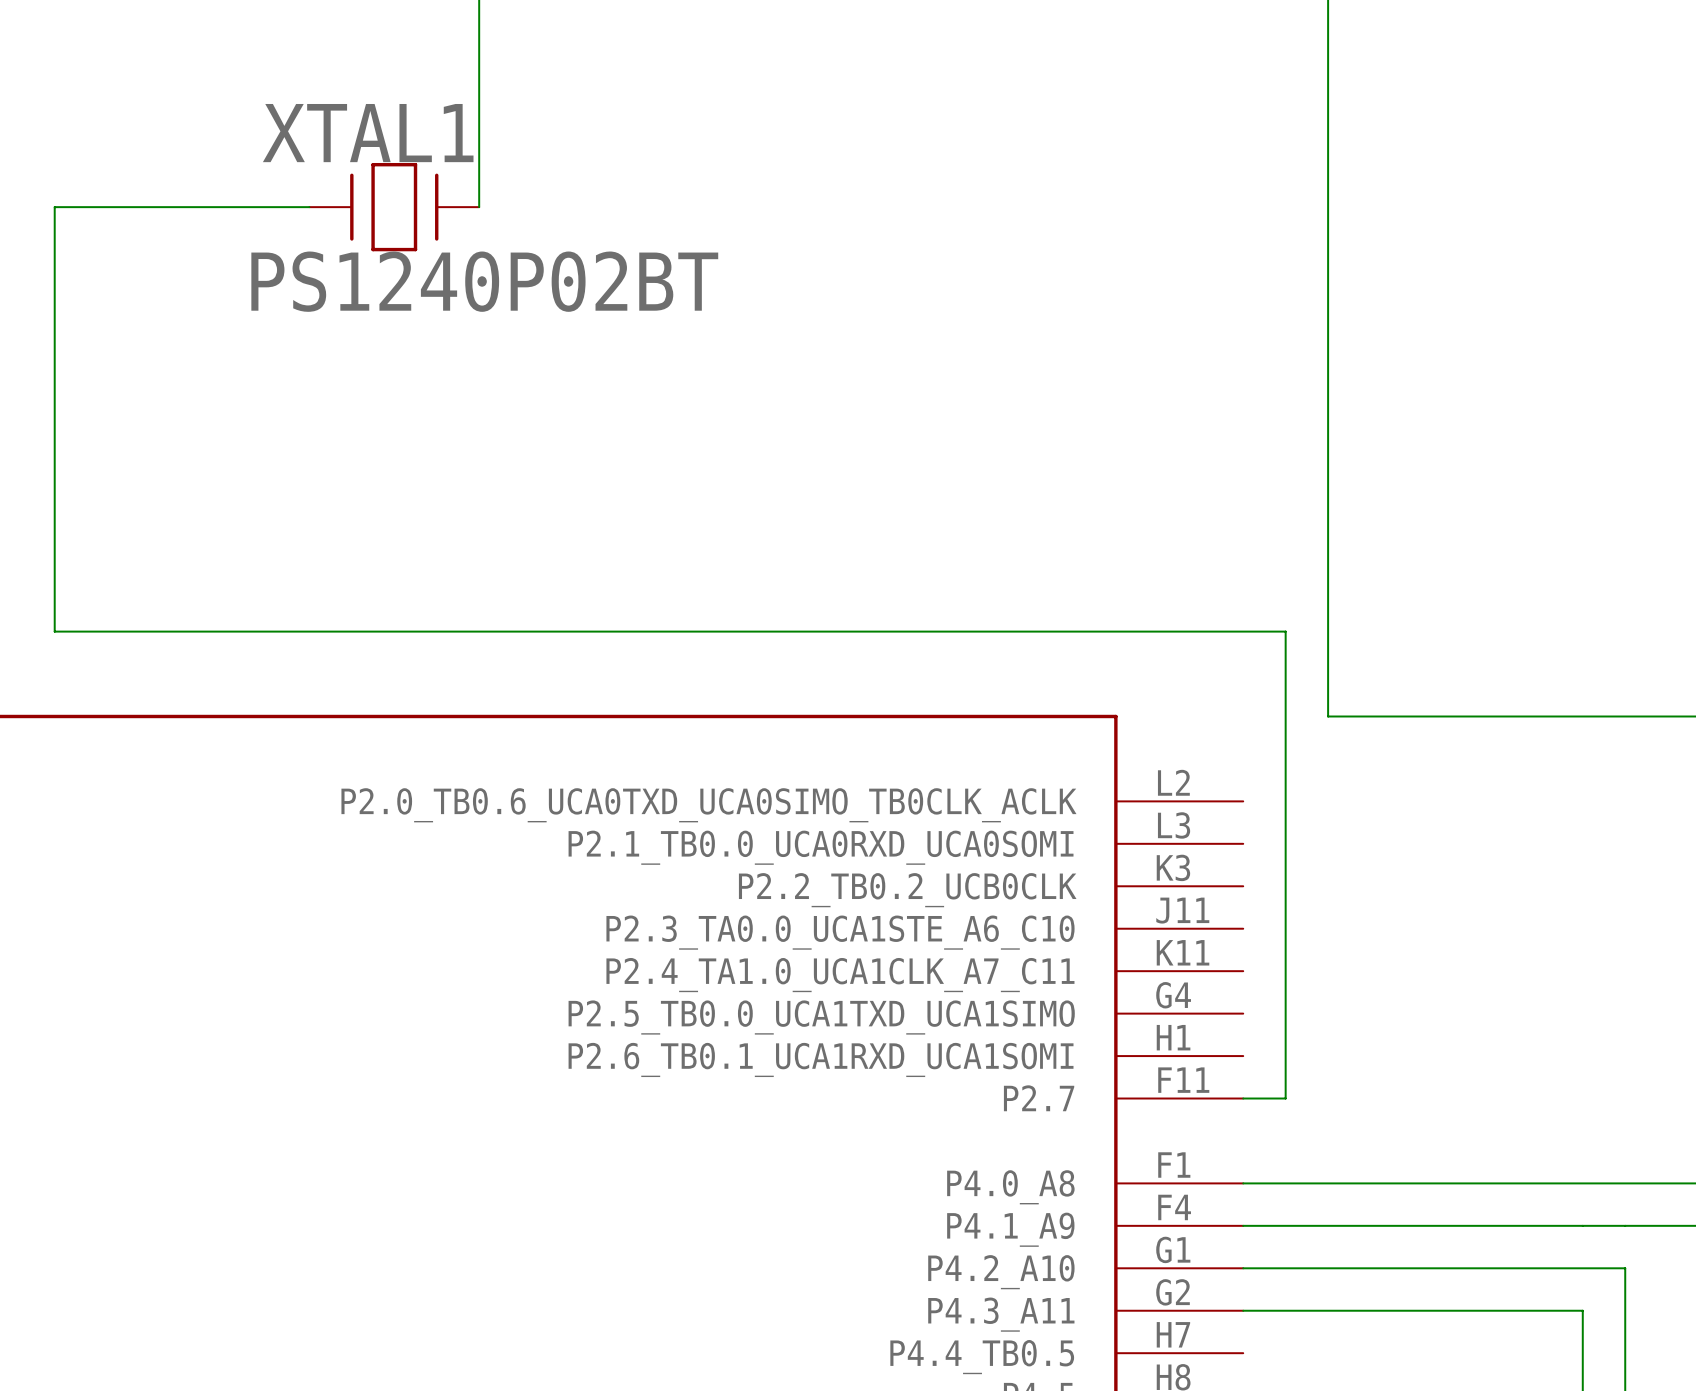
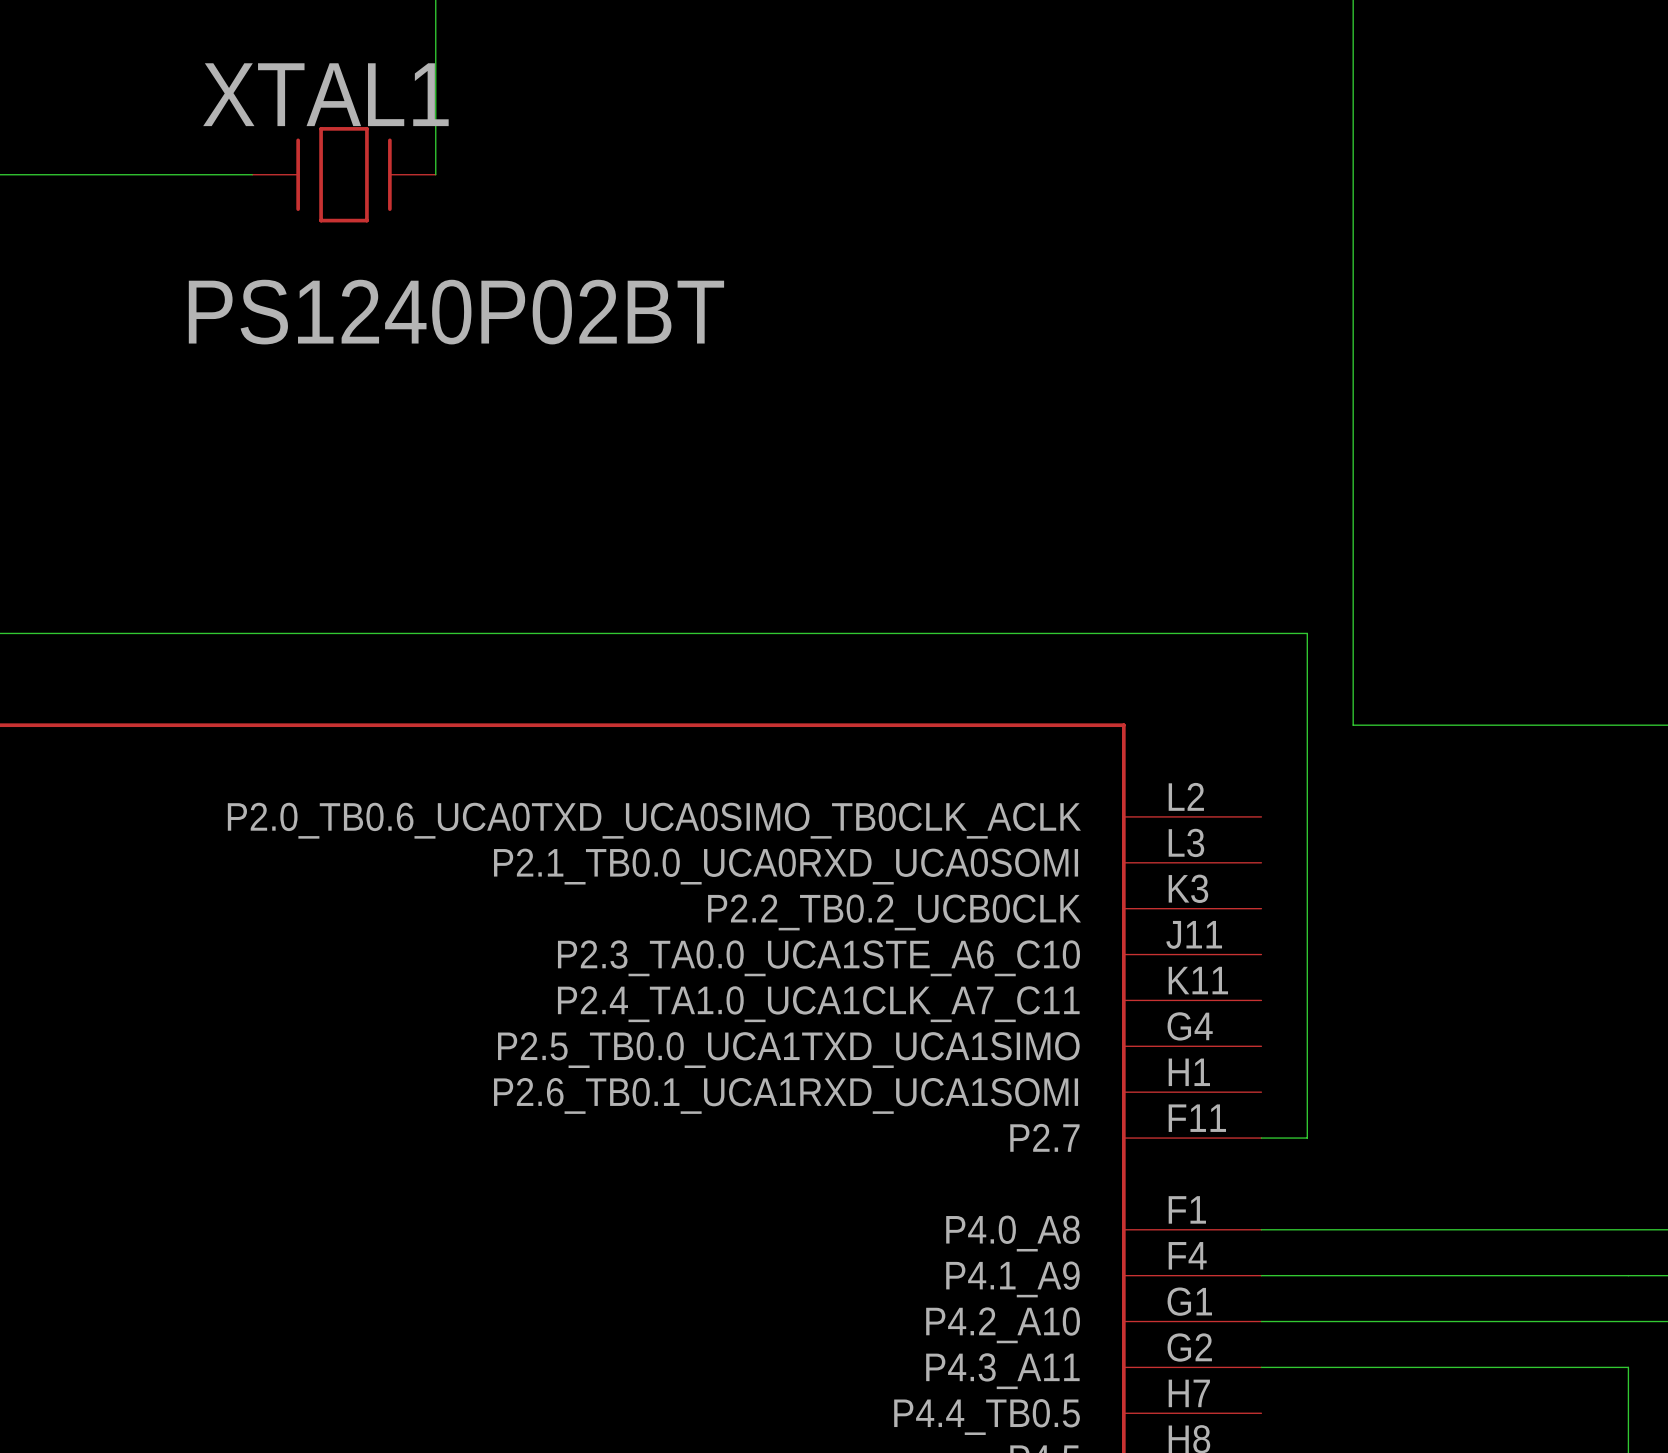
XTAL1 value position: PS1240P02BT (484, 281) -> PS1240P02BT (456, 312)

